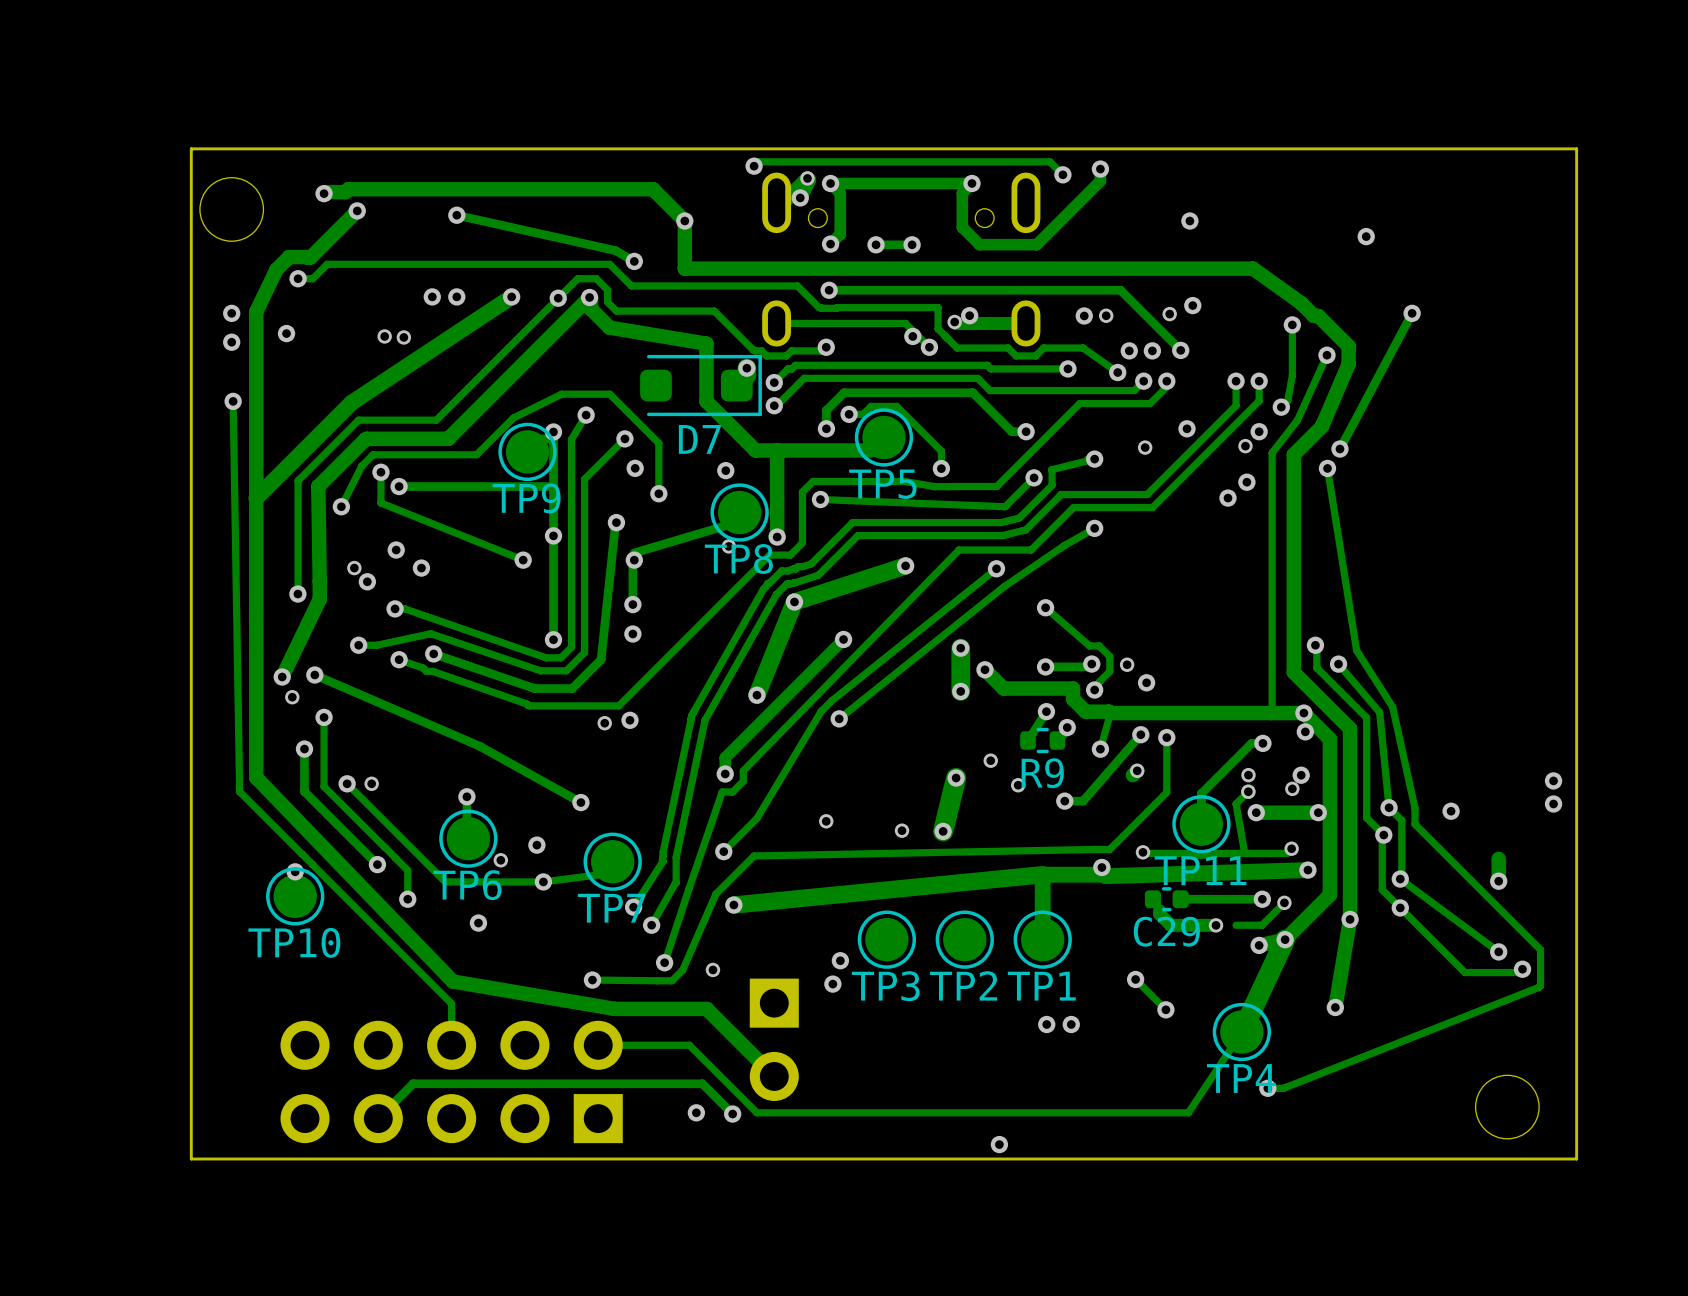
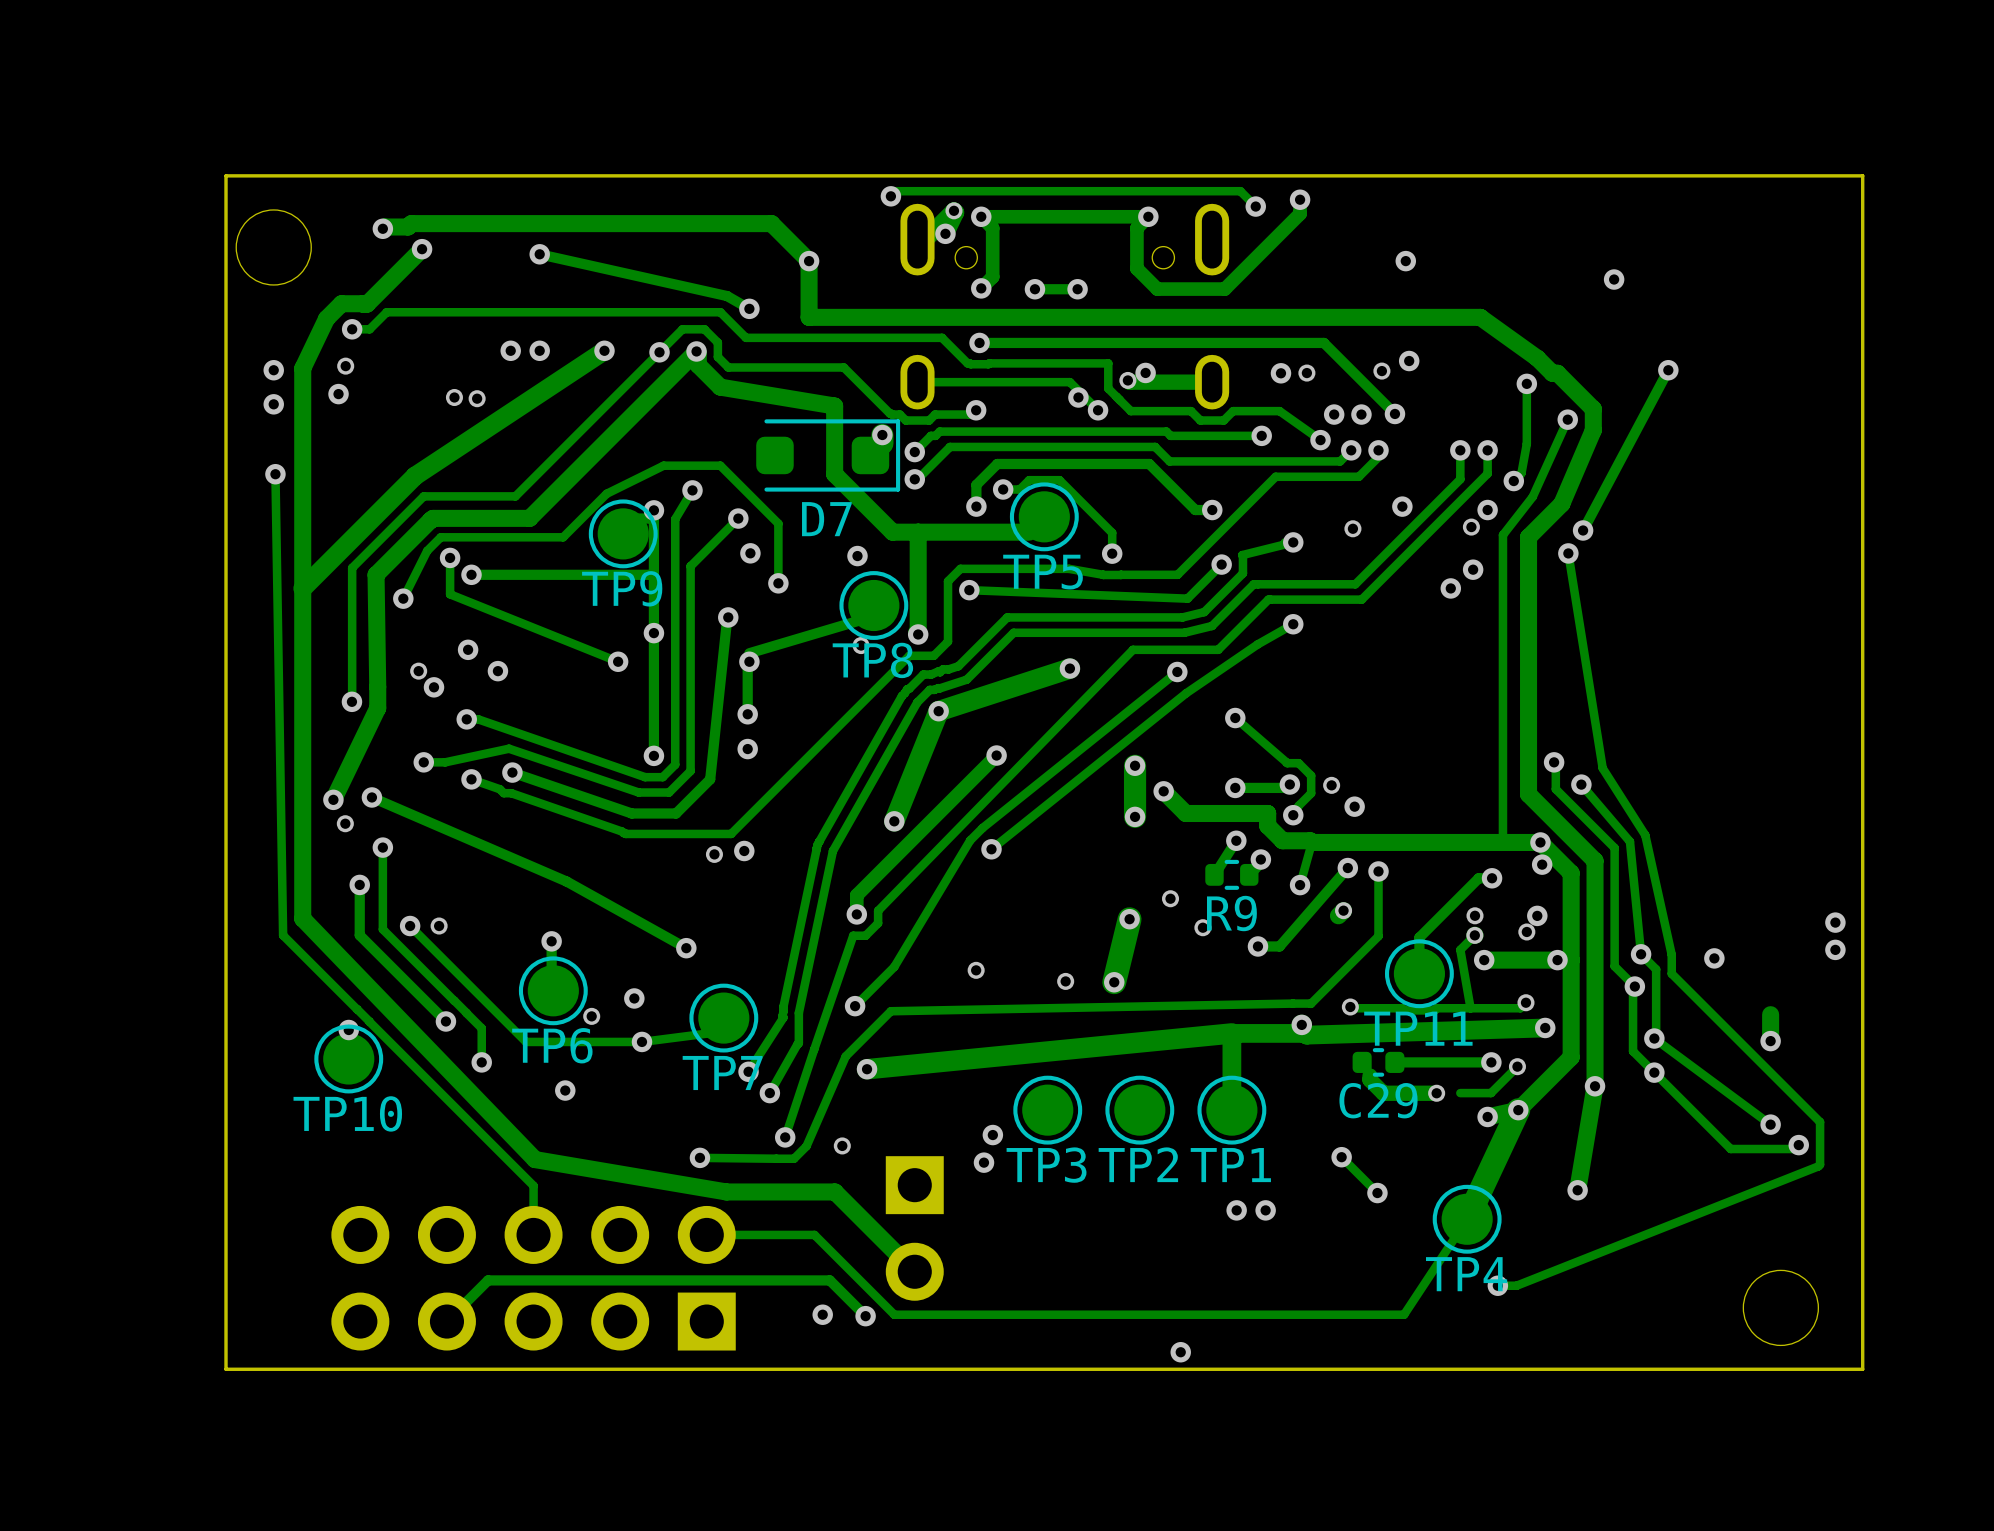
via: none -> (345, 366)

